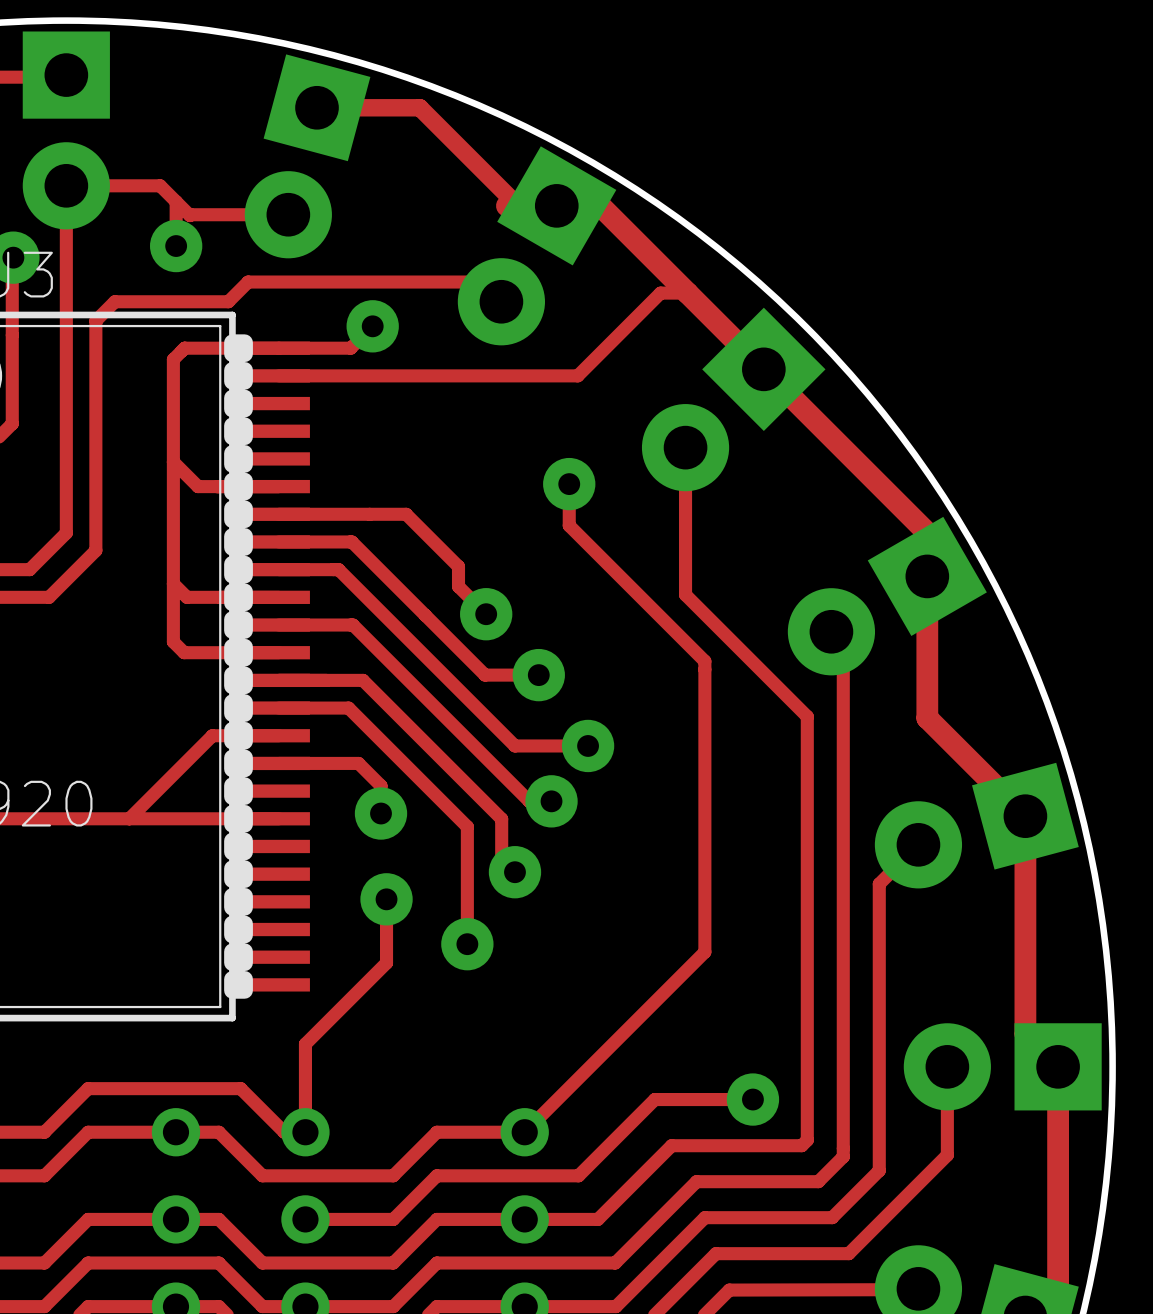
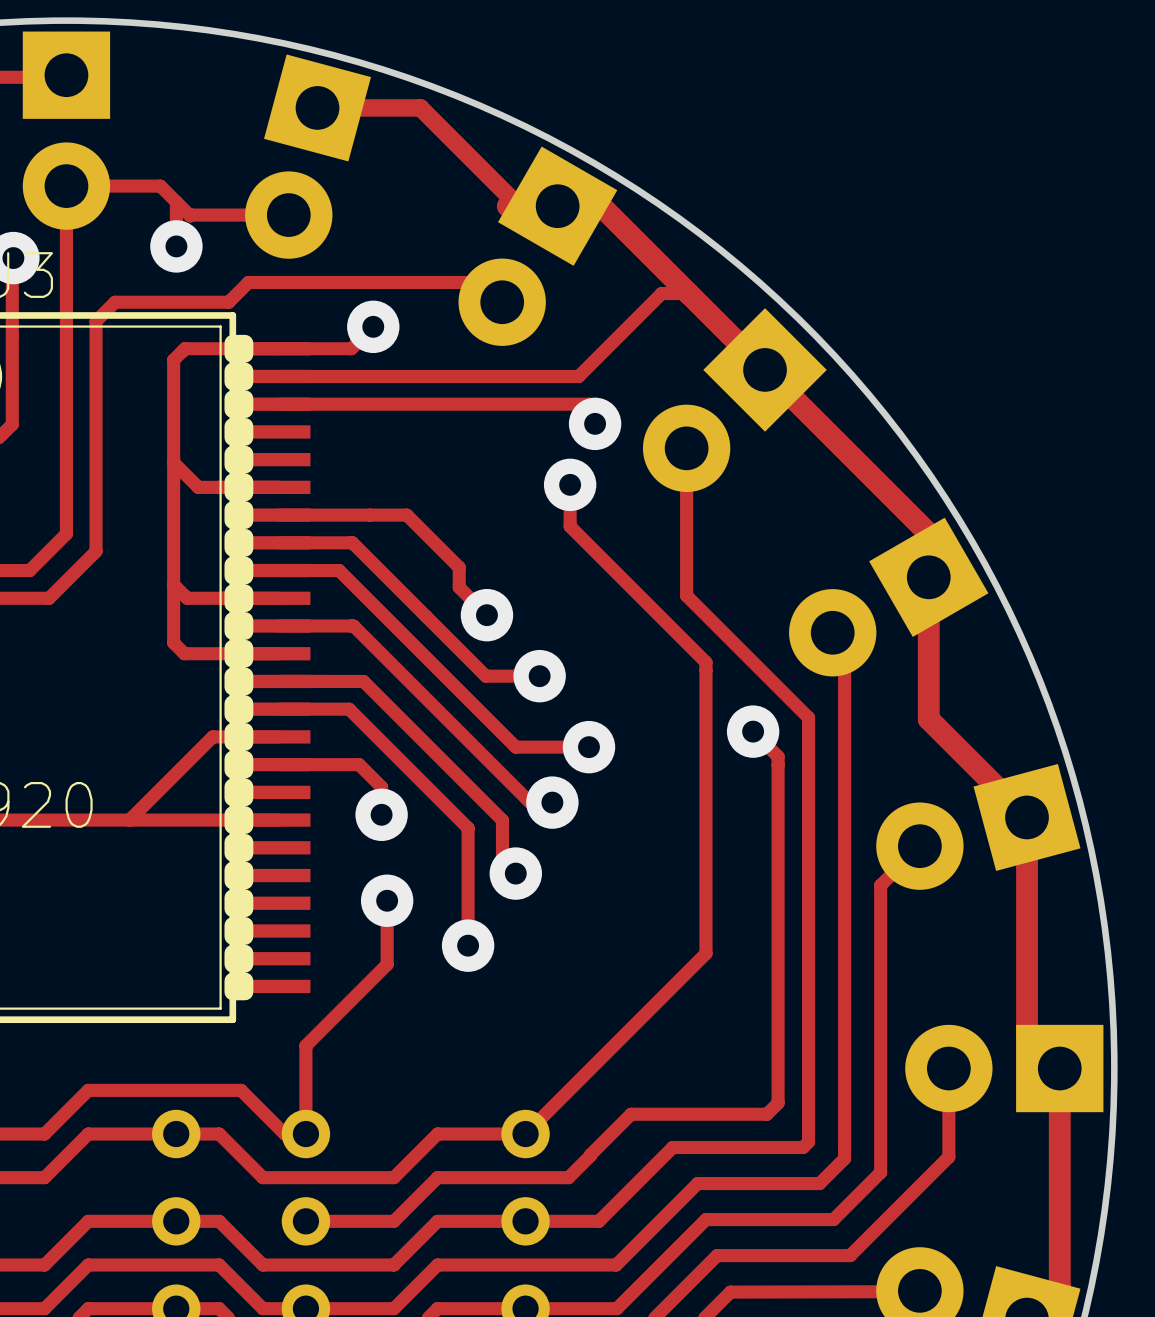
track: none -> (279, 404) (589, 404) (595, 410) (595, 423)
via: none -> (595, 423)
track: none -> (753, 731) (778, 756) (778, 1103) (766, 1114) (631, 1114) (590, 1154)
via: none -> (753, 731)
via: (752, 1099) -> none
track: (763, 1099) (654, 1099) (578, 1175) (567, 1175) -> (590, 1155) (568, 1177)

